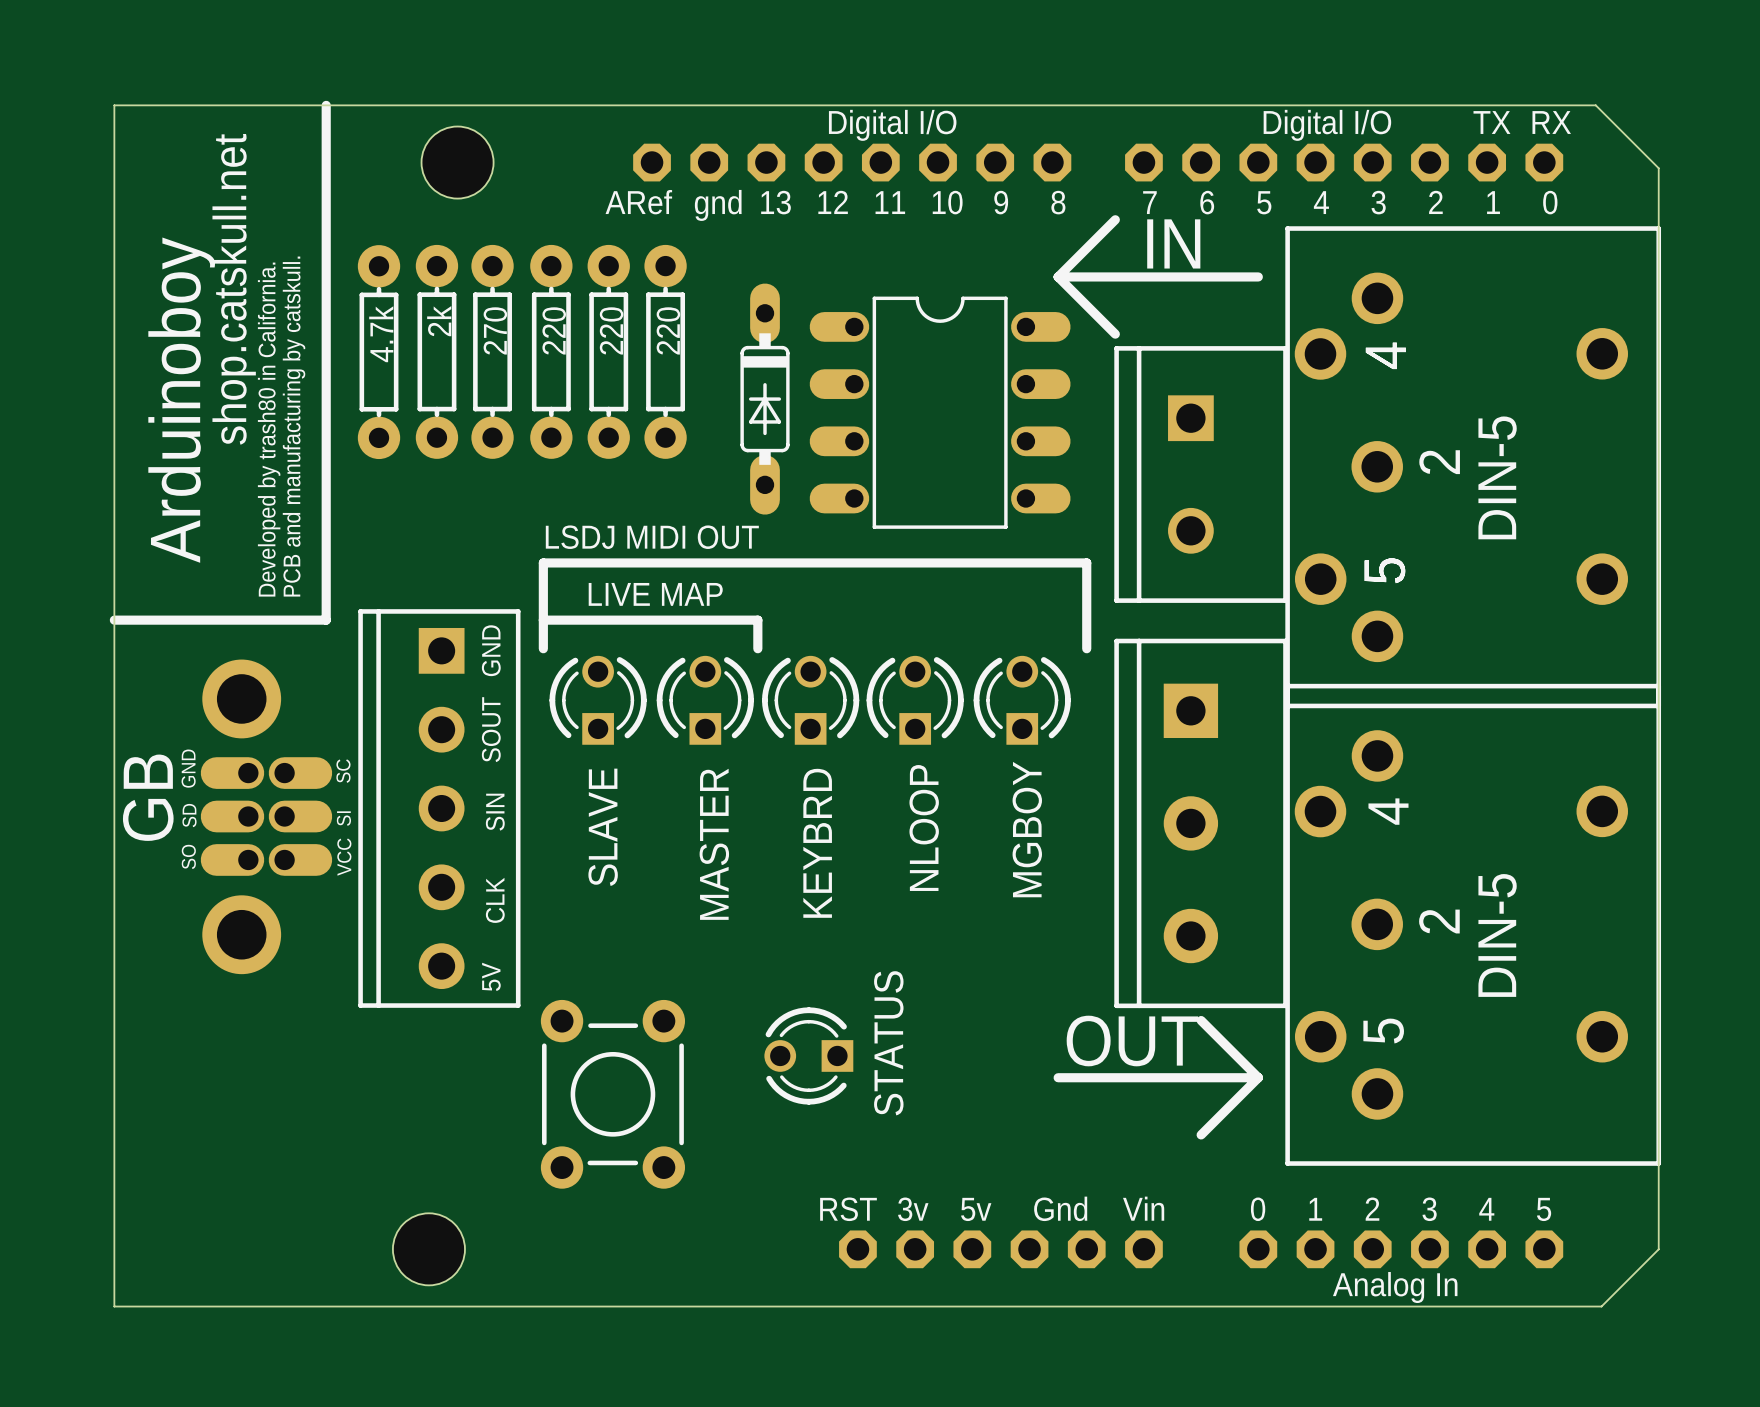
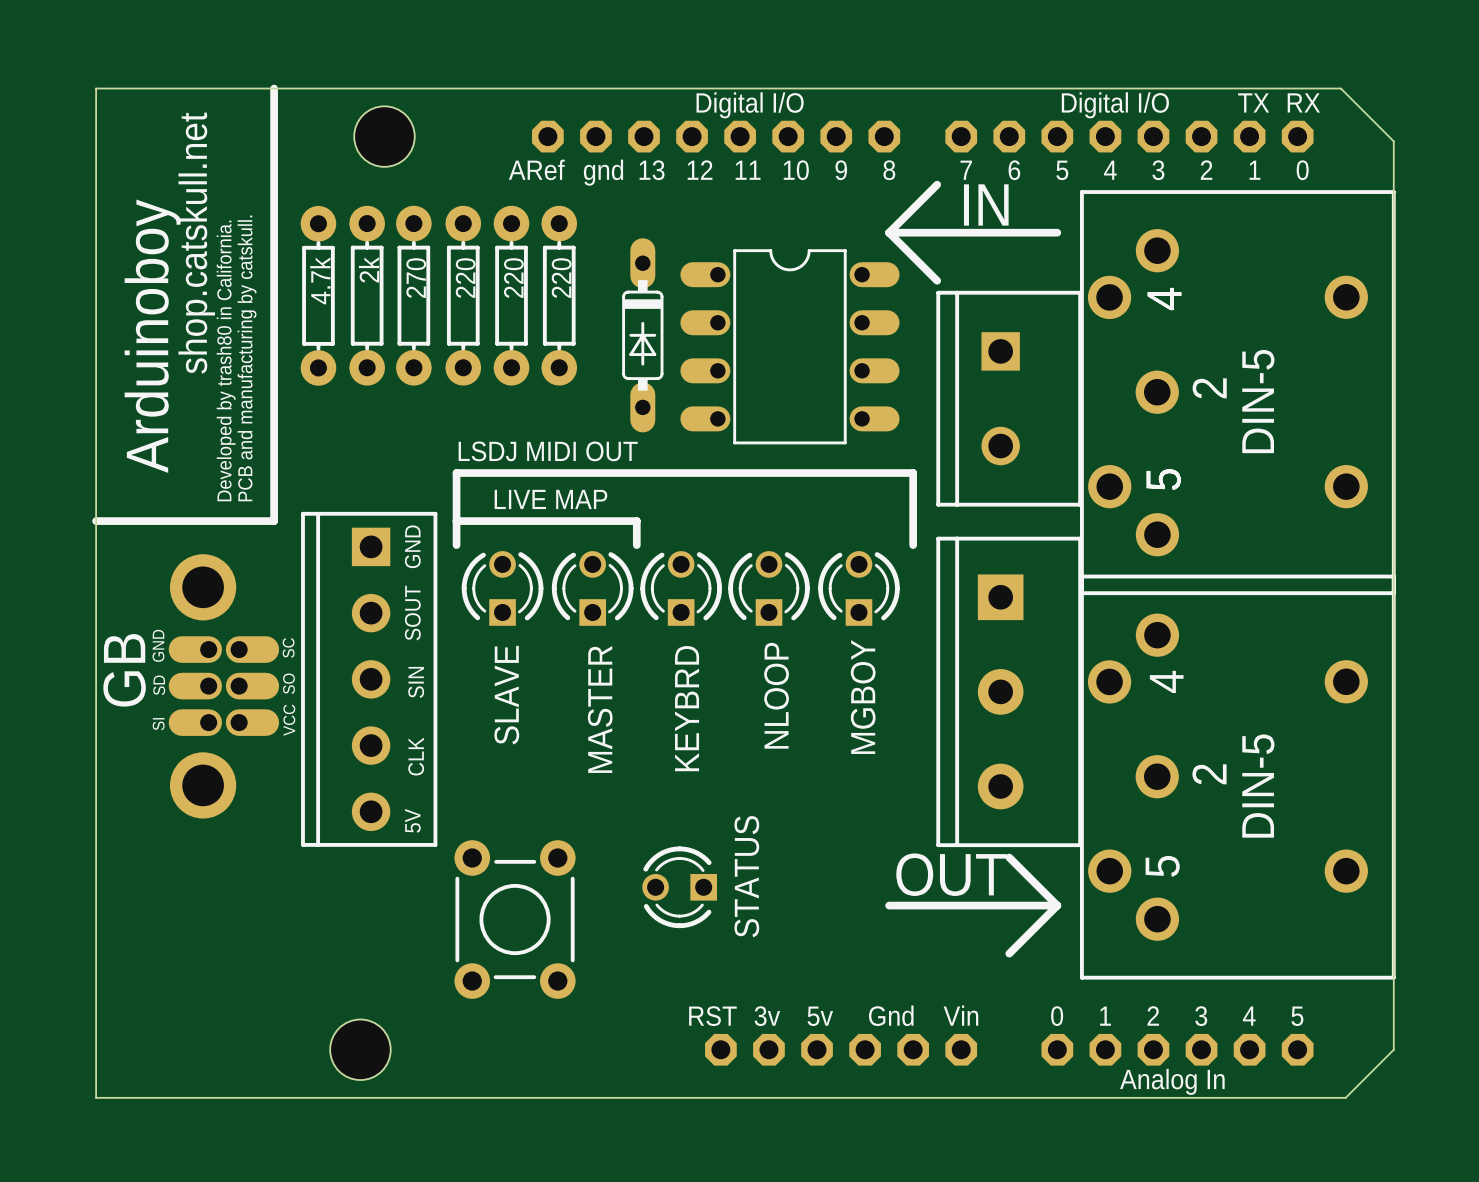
part text: SI (343, 818) -> SO (288, 683)
part text: SO (188, 856) -> SI (158, 724)

